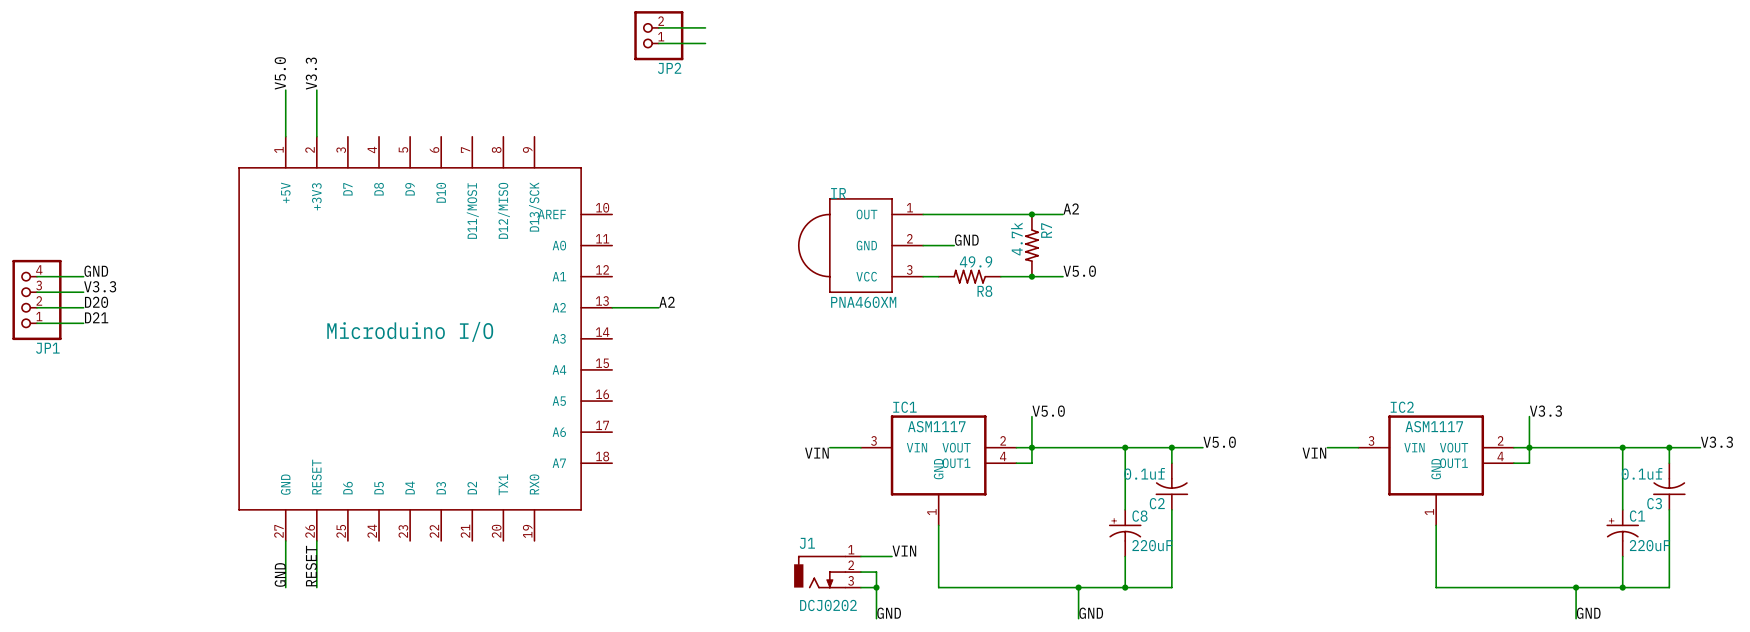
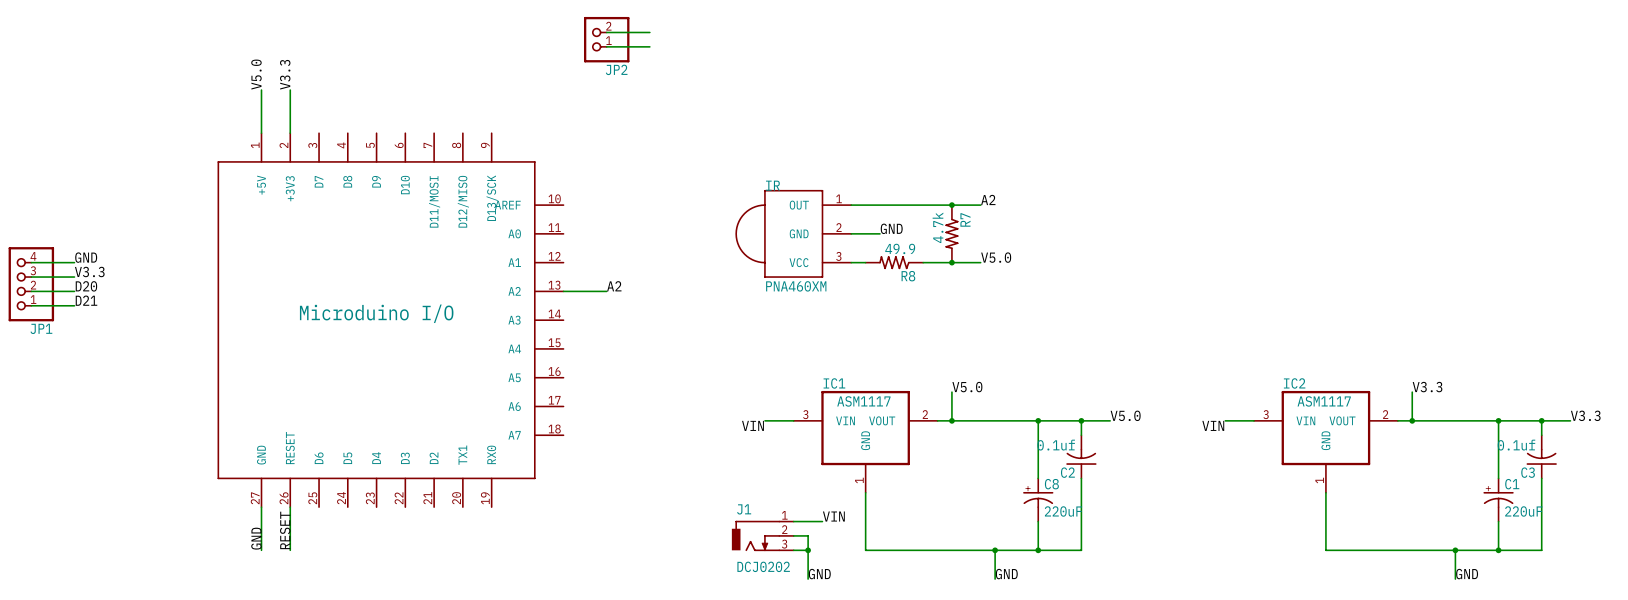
IC1 symbol: [860, 415, 1017, 526] -> [793, 390, 938, 493]
IC2 symbol: [1358, 415, 1514, 526] -> [1254, 390, 1398, 493]
wire: (1031, 447) (1031, 463) (1016, 463) -> none
wire: (1529, 447) (1529, 463) (1513, 463) -> none

